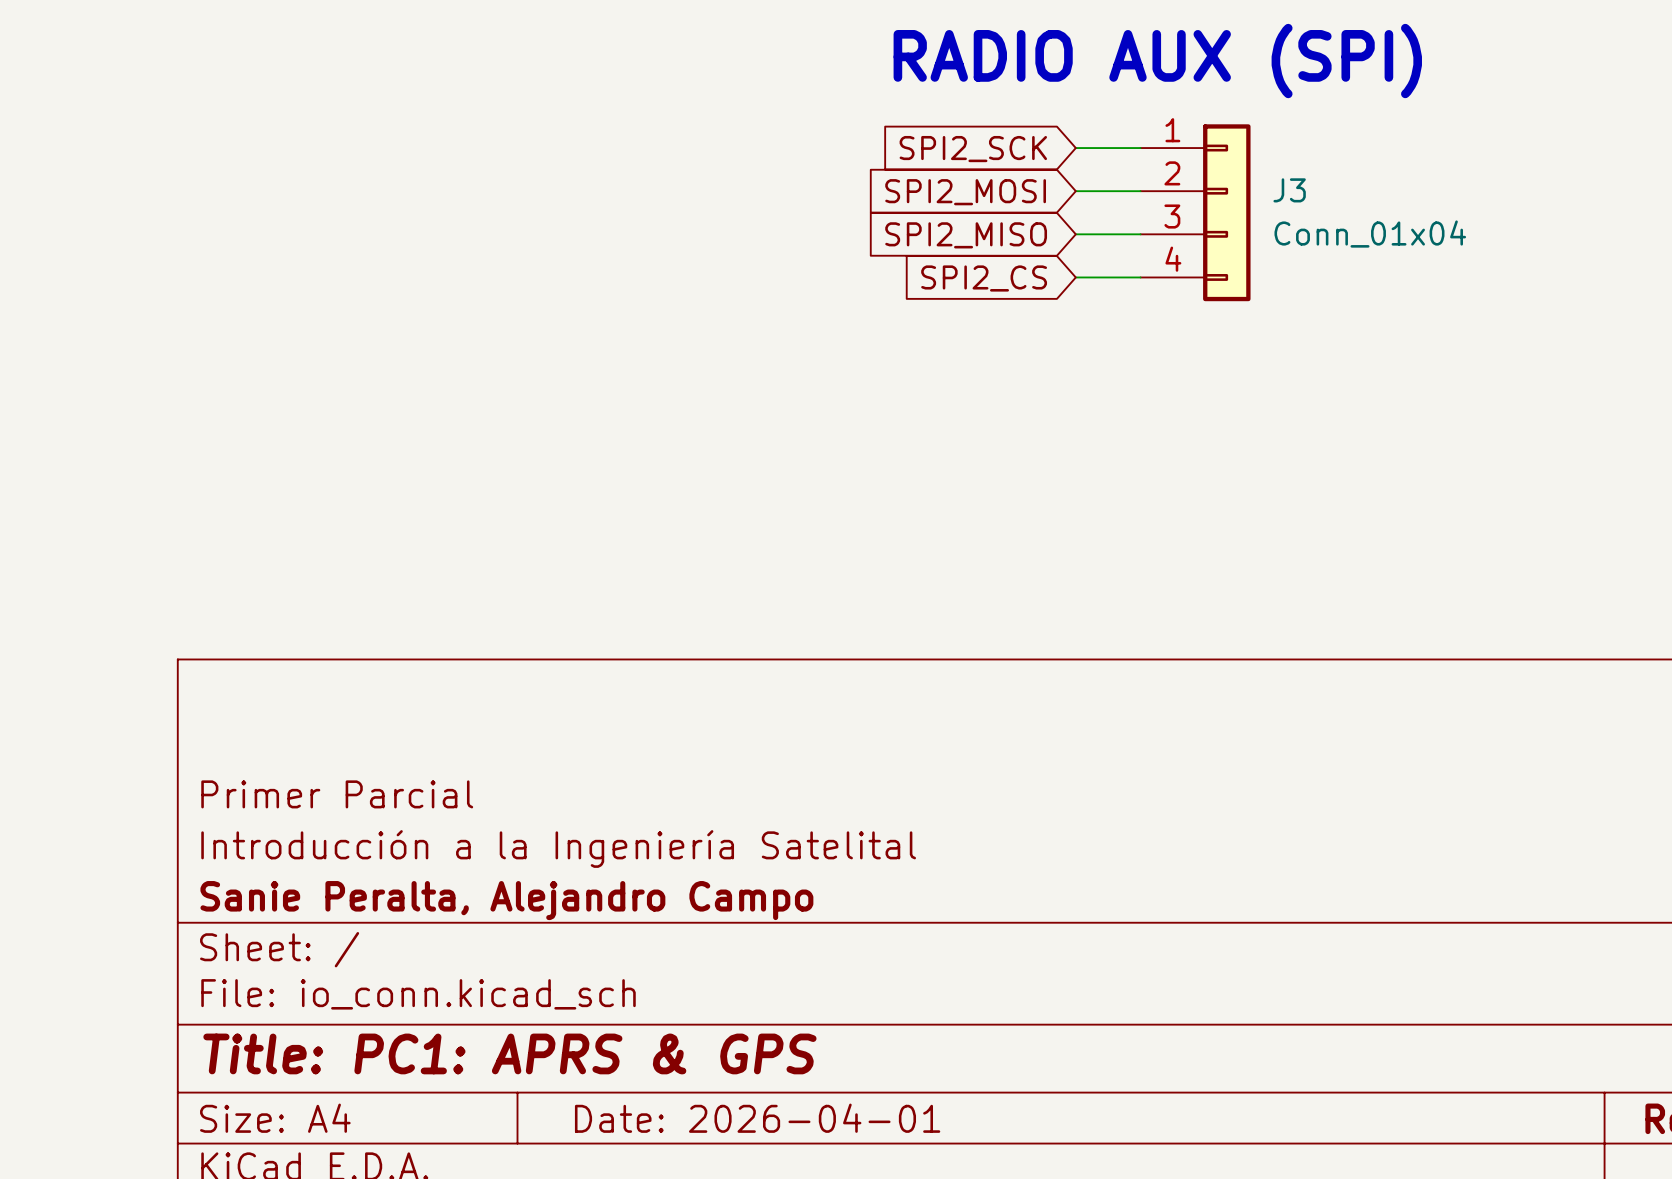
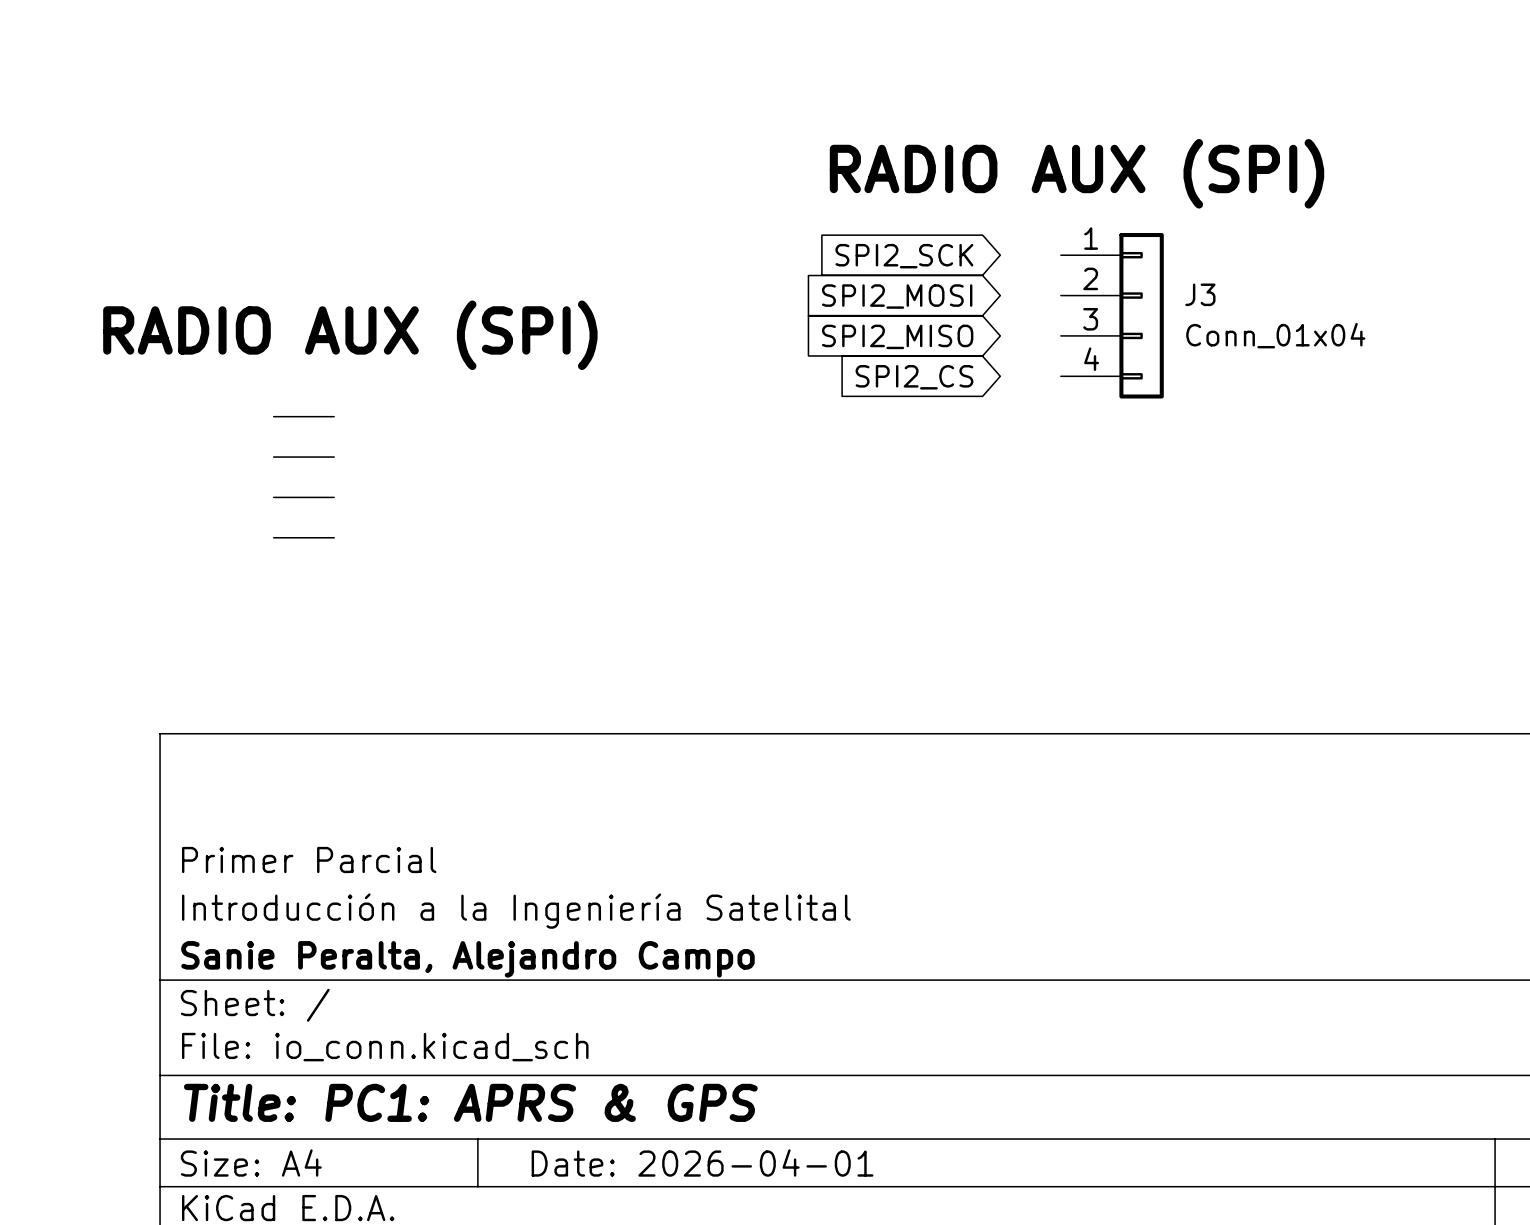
wire: (1075, 148) (1140, 148) -> none
wire: (1075, 191) (1140, 191) -> none
text: none -> RADIO AUX (SPI) (350, 335)
wire: (1075, 234) (1140, 234) -> none
wire: (1075, 277) (1140, 277) -> none
wire: none -> (273, 416) (334, 416)
wire: none -> (273, 457) (334, 457)
wire: none -> (273, 497) (334, 497)
wire: none -> (273, 537) (334, 537)

